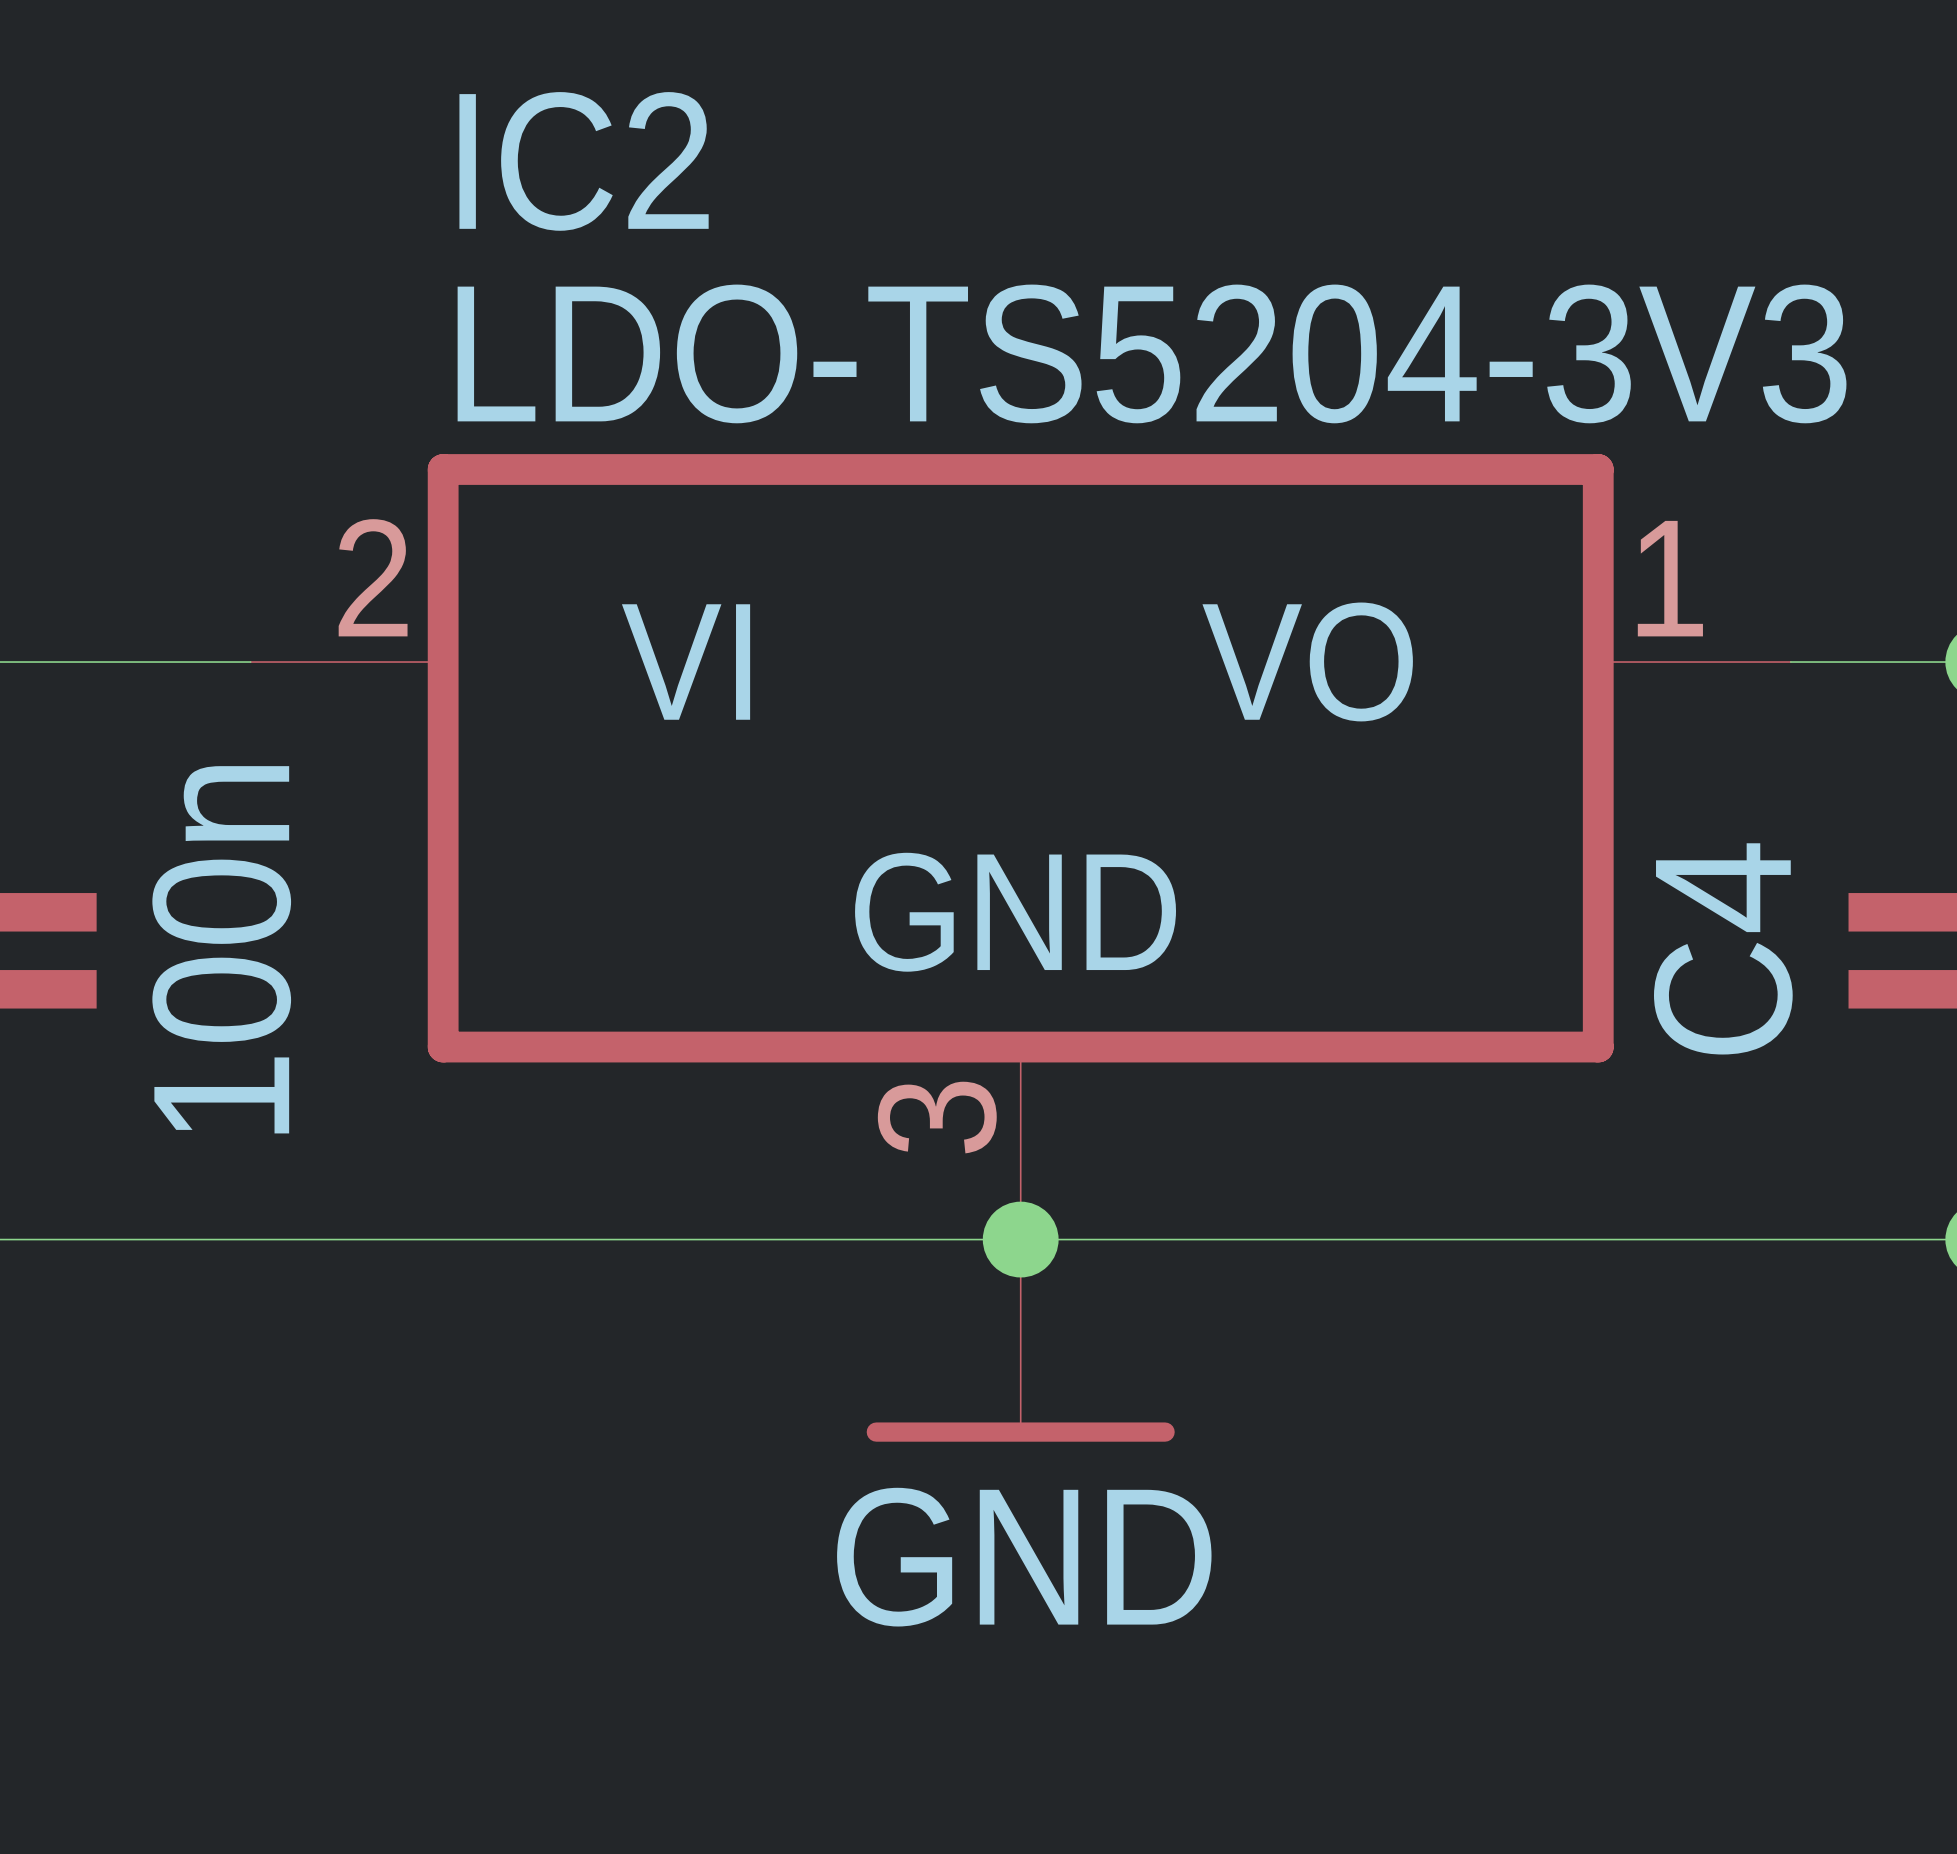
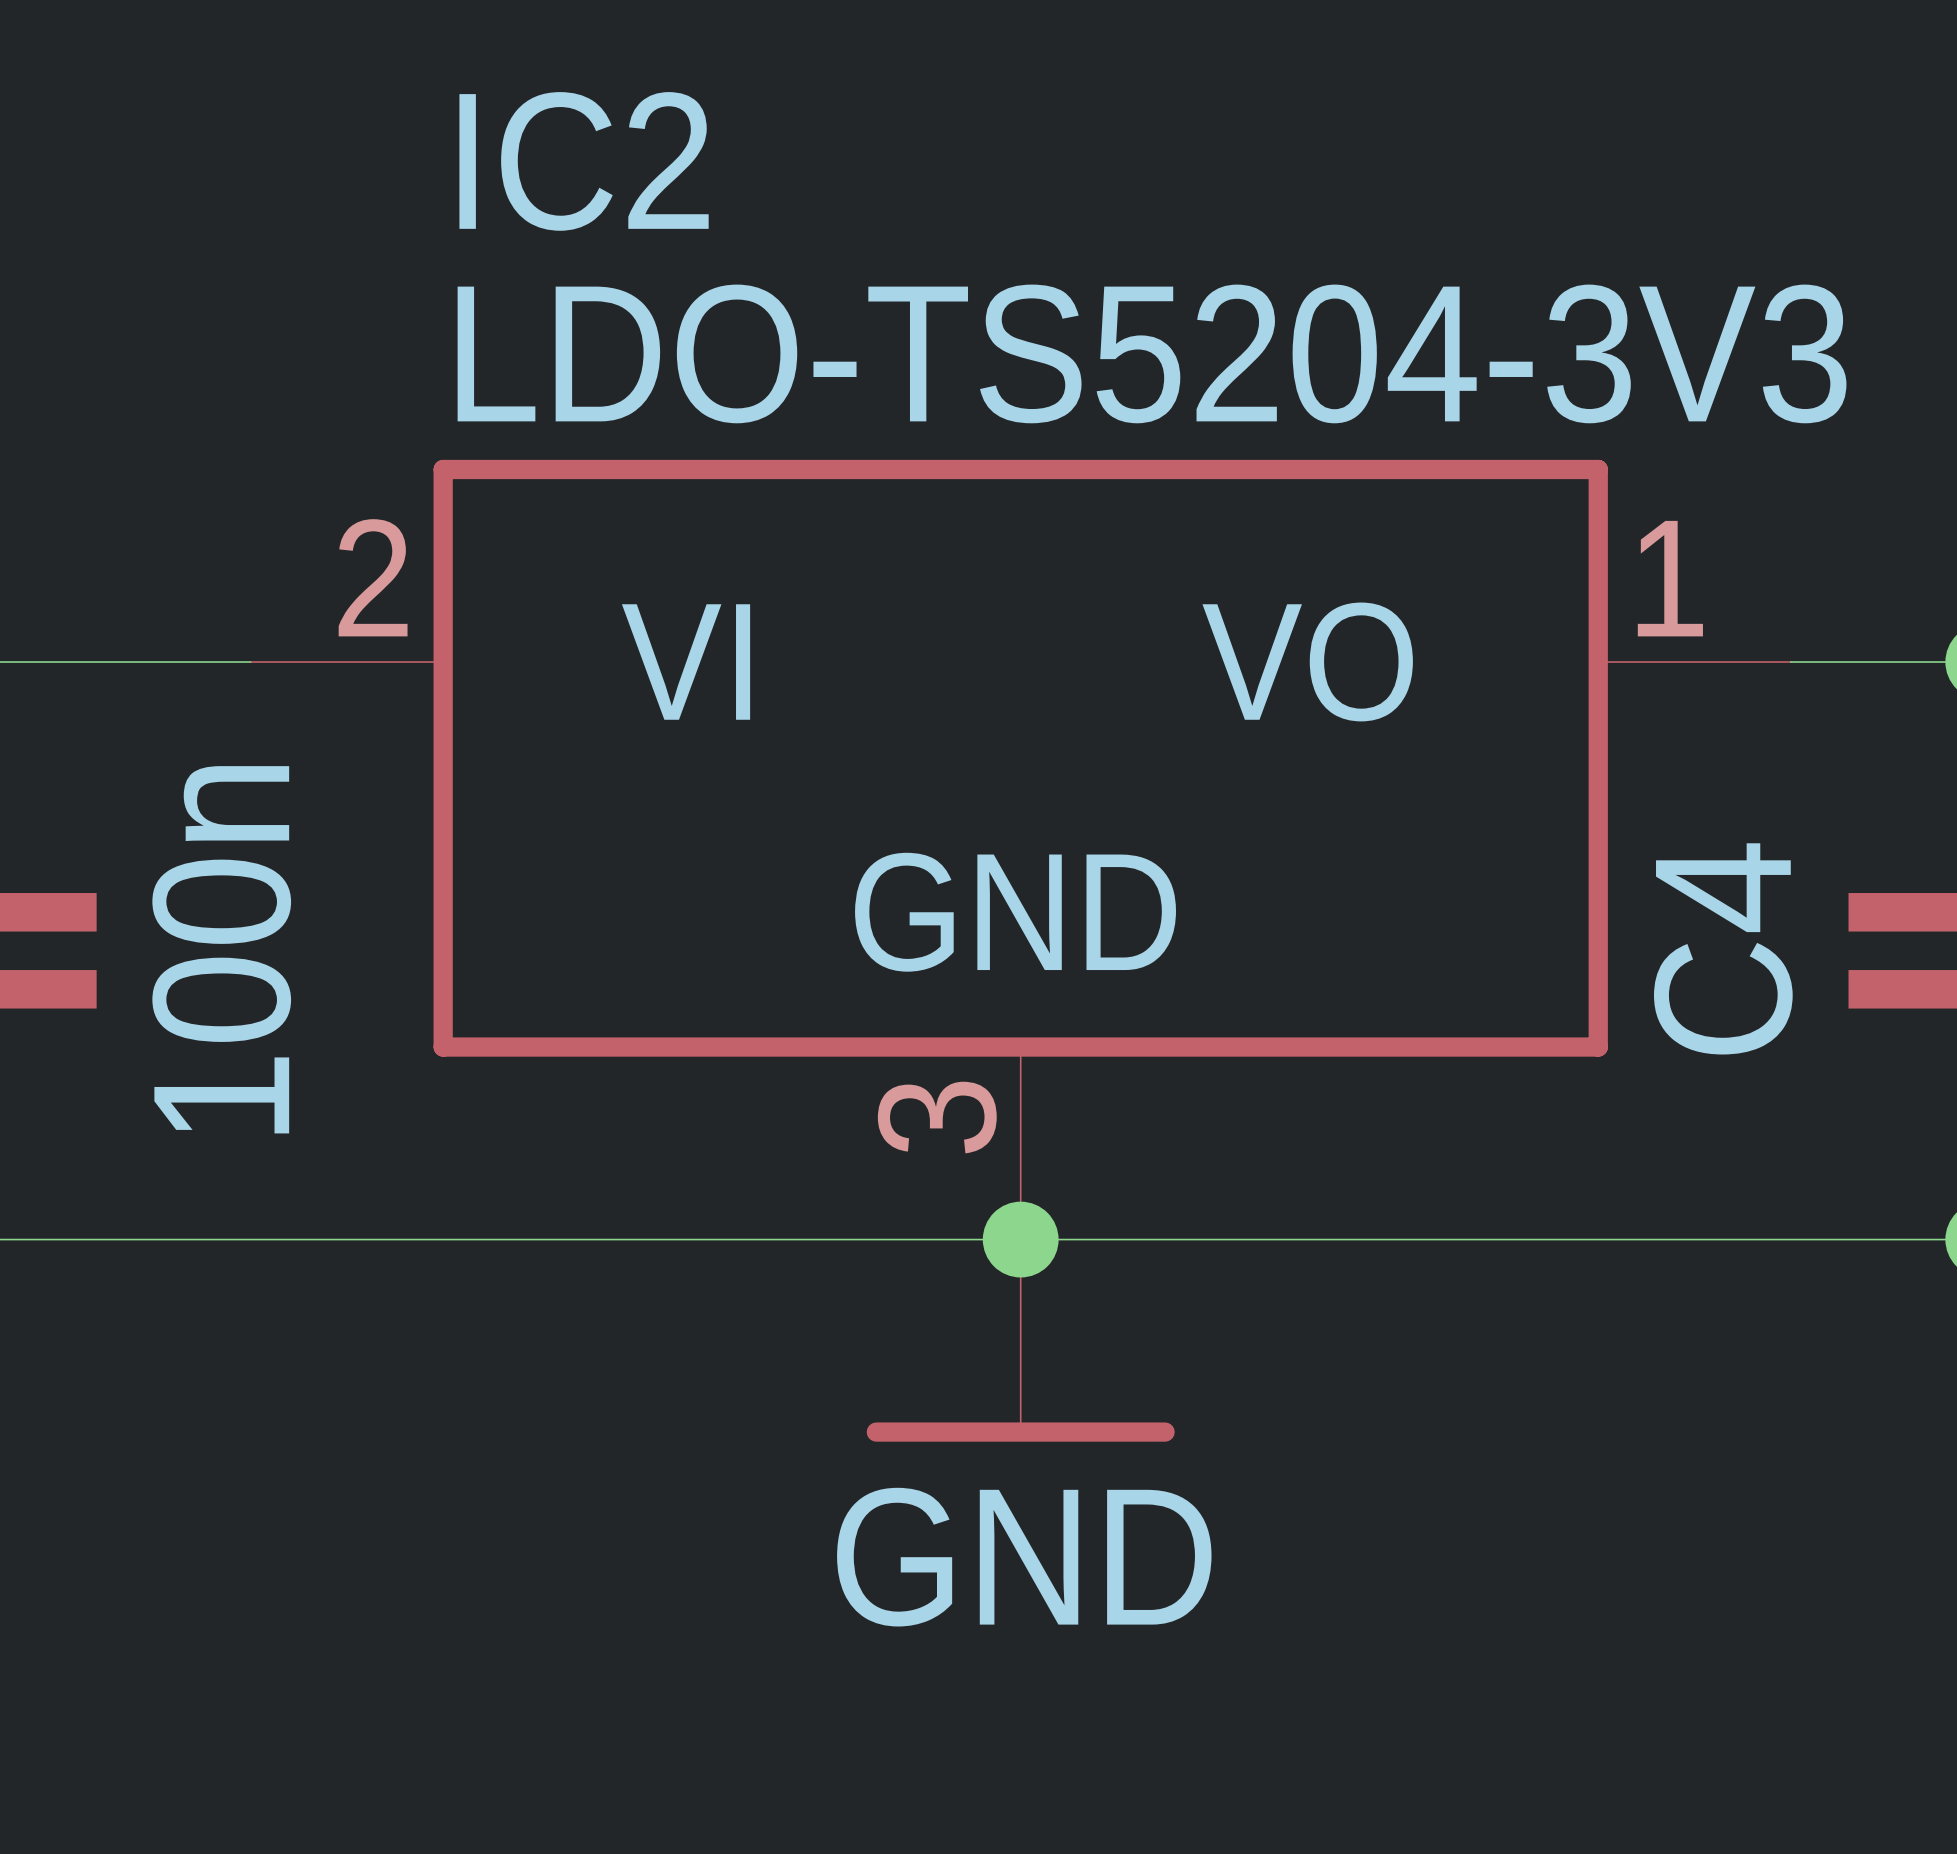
IC2 symbol: [250, 454, 1791, 1240] -> [250, 459, 1791, 1240]

